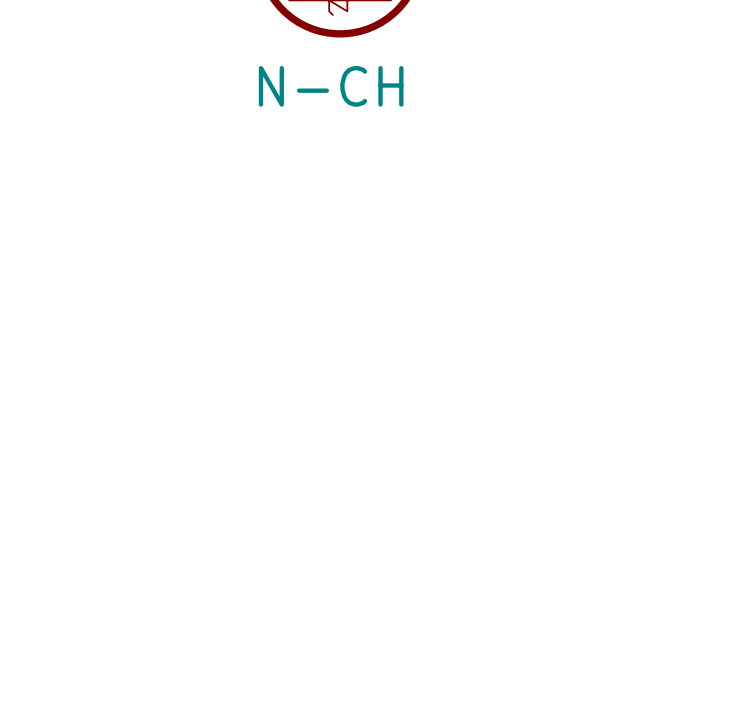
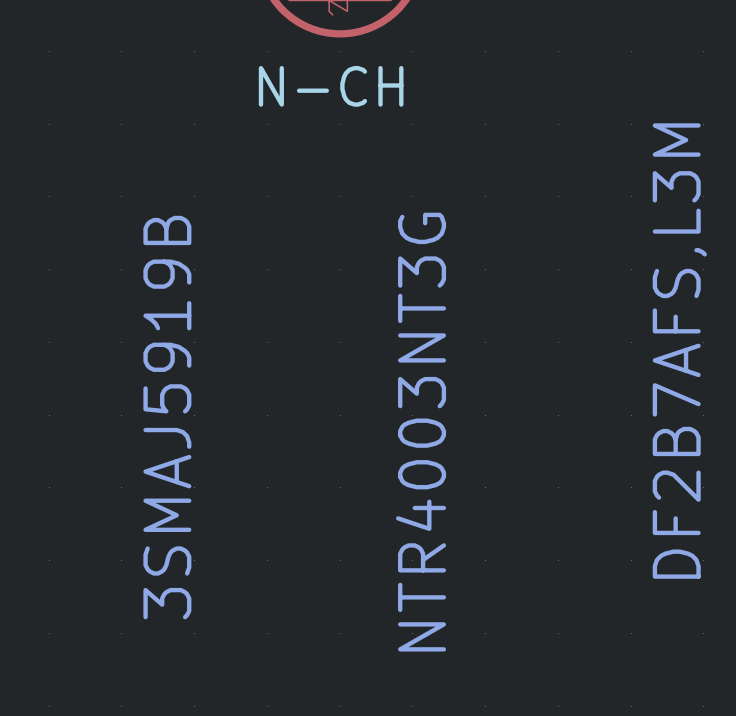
text: none -> DF2B7AFS,L3M (679, 351)
text: none -> 3SMAJ5919B (167, 417)
text: none -> NTR4003NT3G (421, 432)

